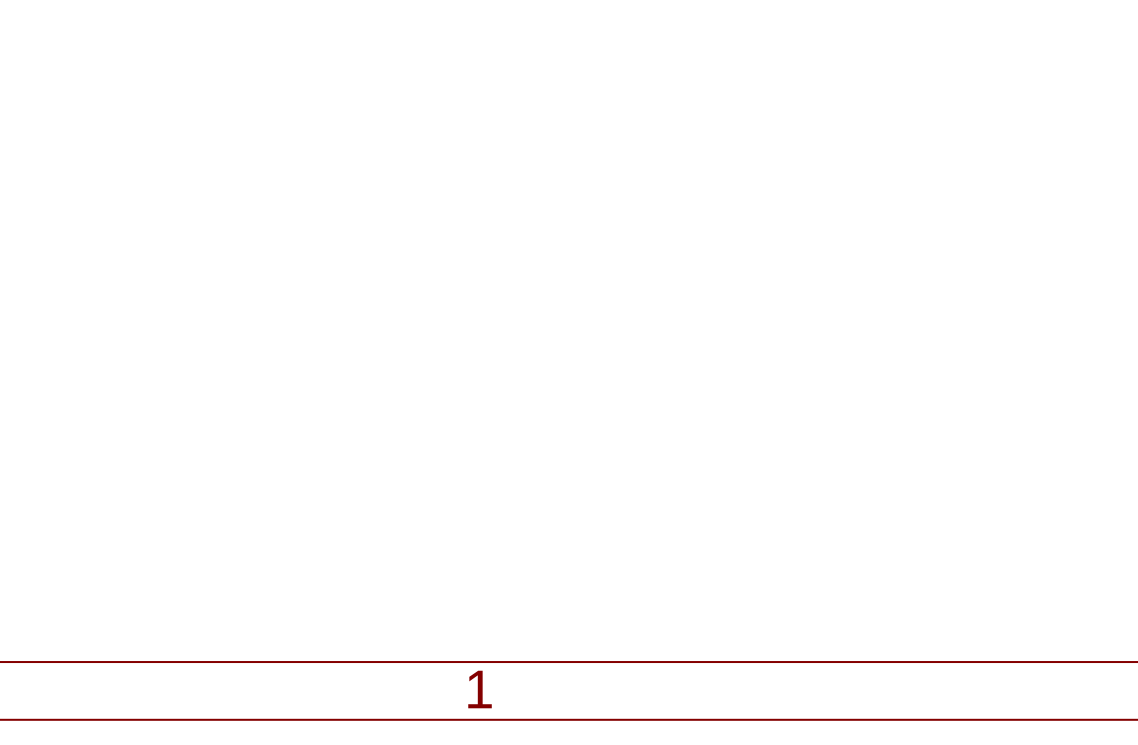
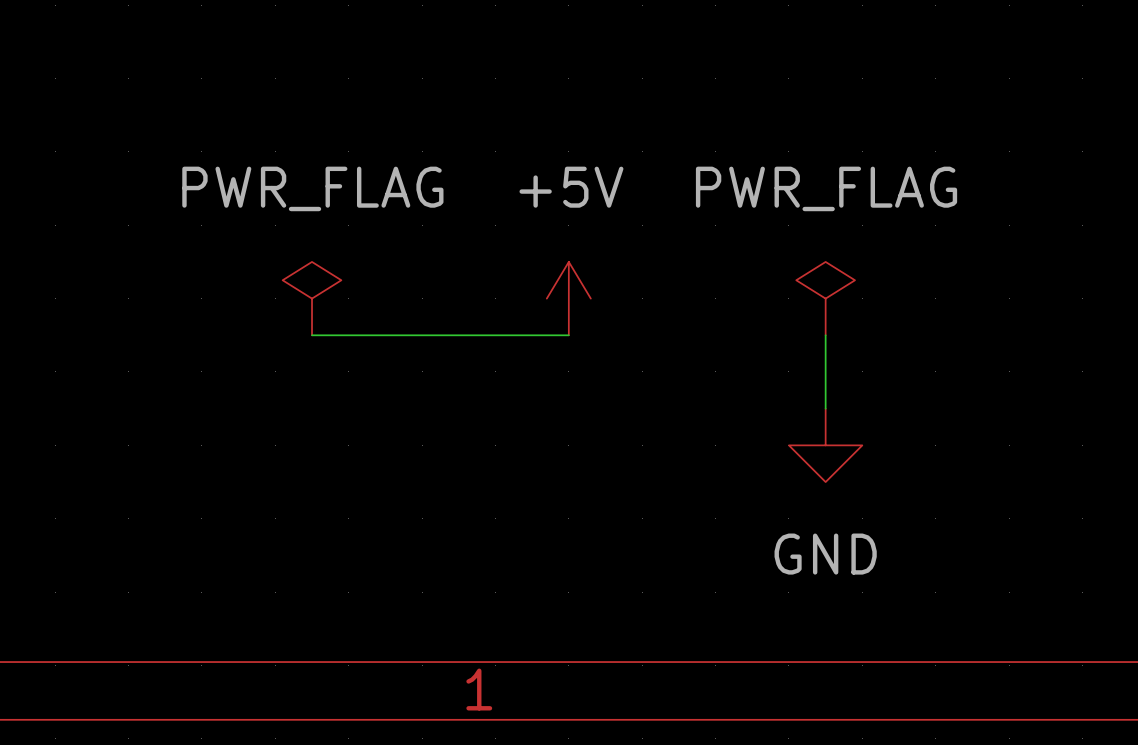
power symbol: none -> PWR_FLAG (312, 298)
power symbol: none -> +5V (568, 298)
power symbol: none -> PWR_FLAG (825, 298)
wire: none -> (312, 335) (568, 335)
wire: none -> (825, 335) (825, 408)
power symbol: none -> GND (825, 445)

